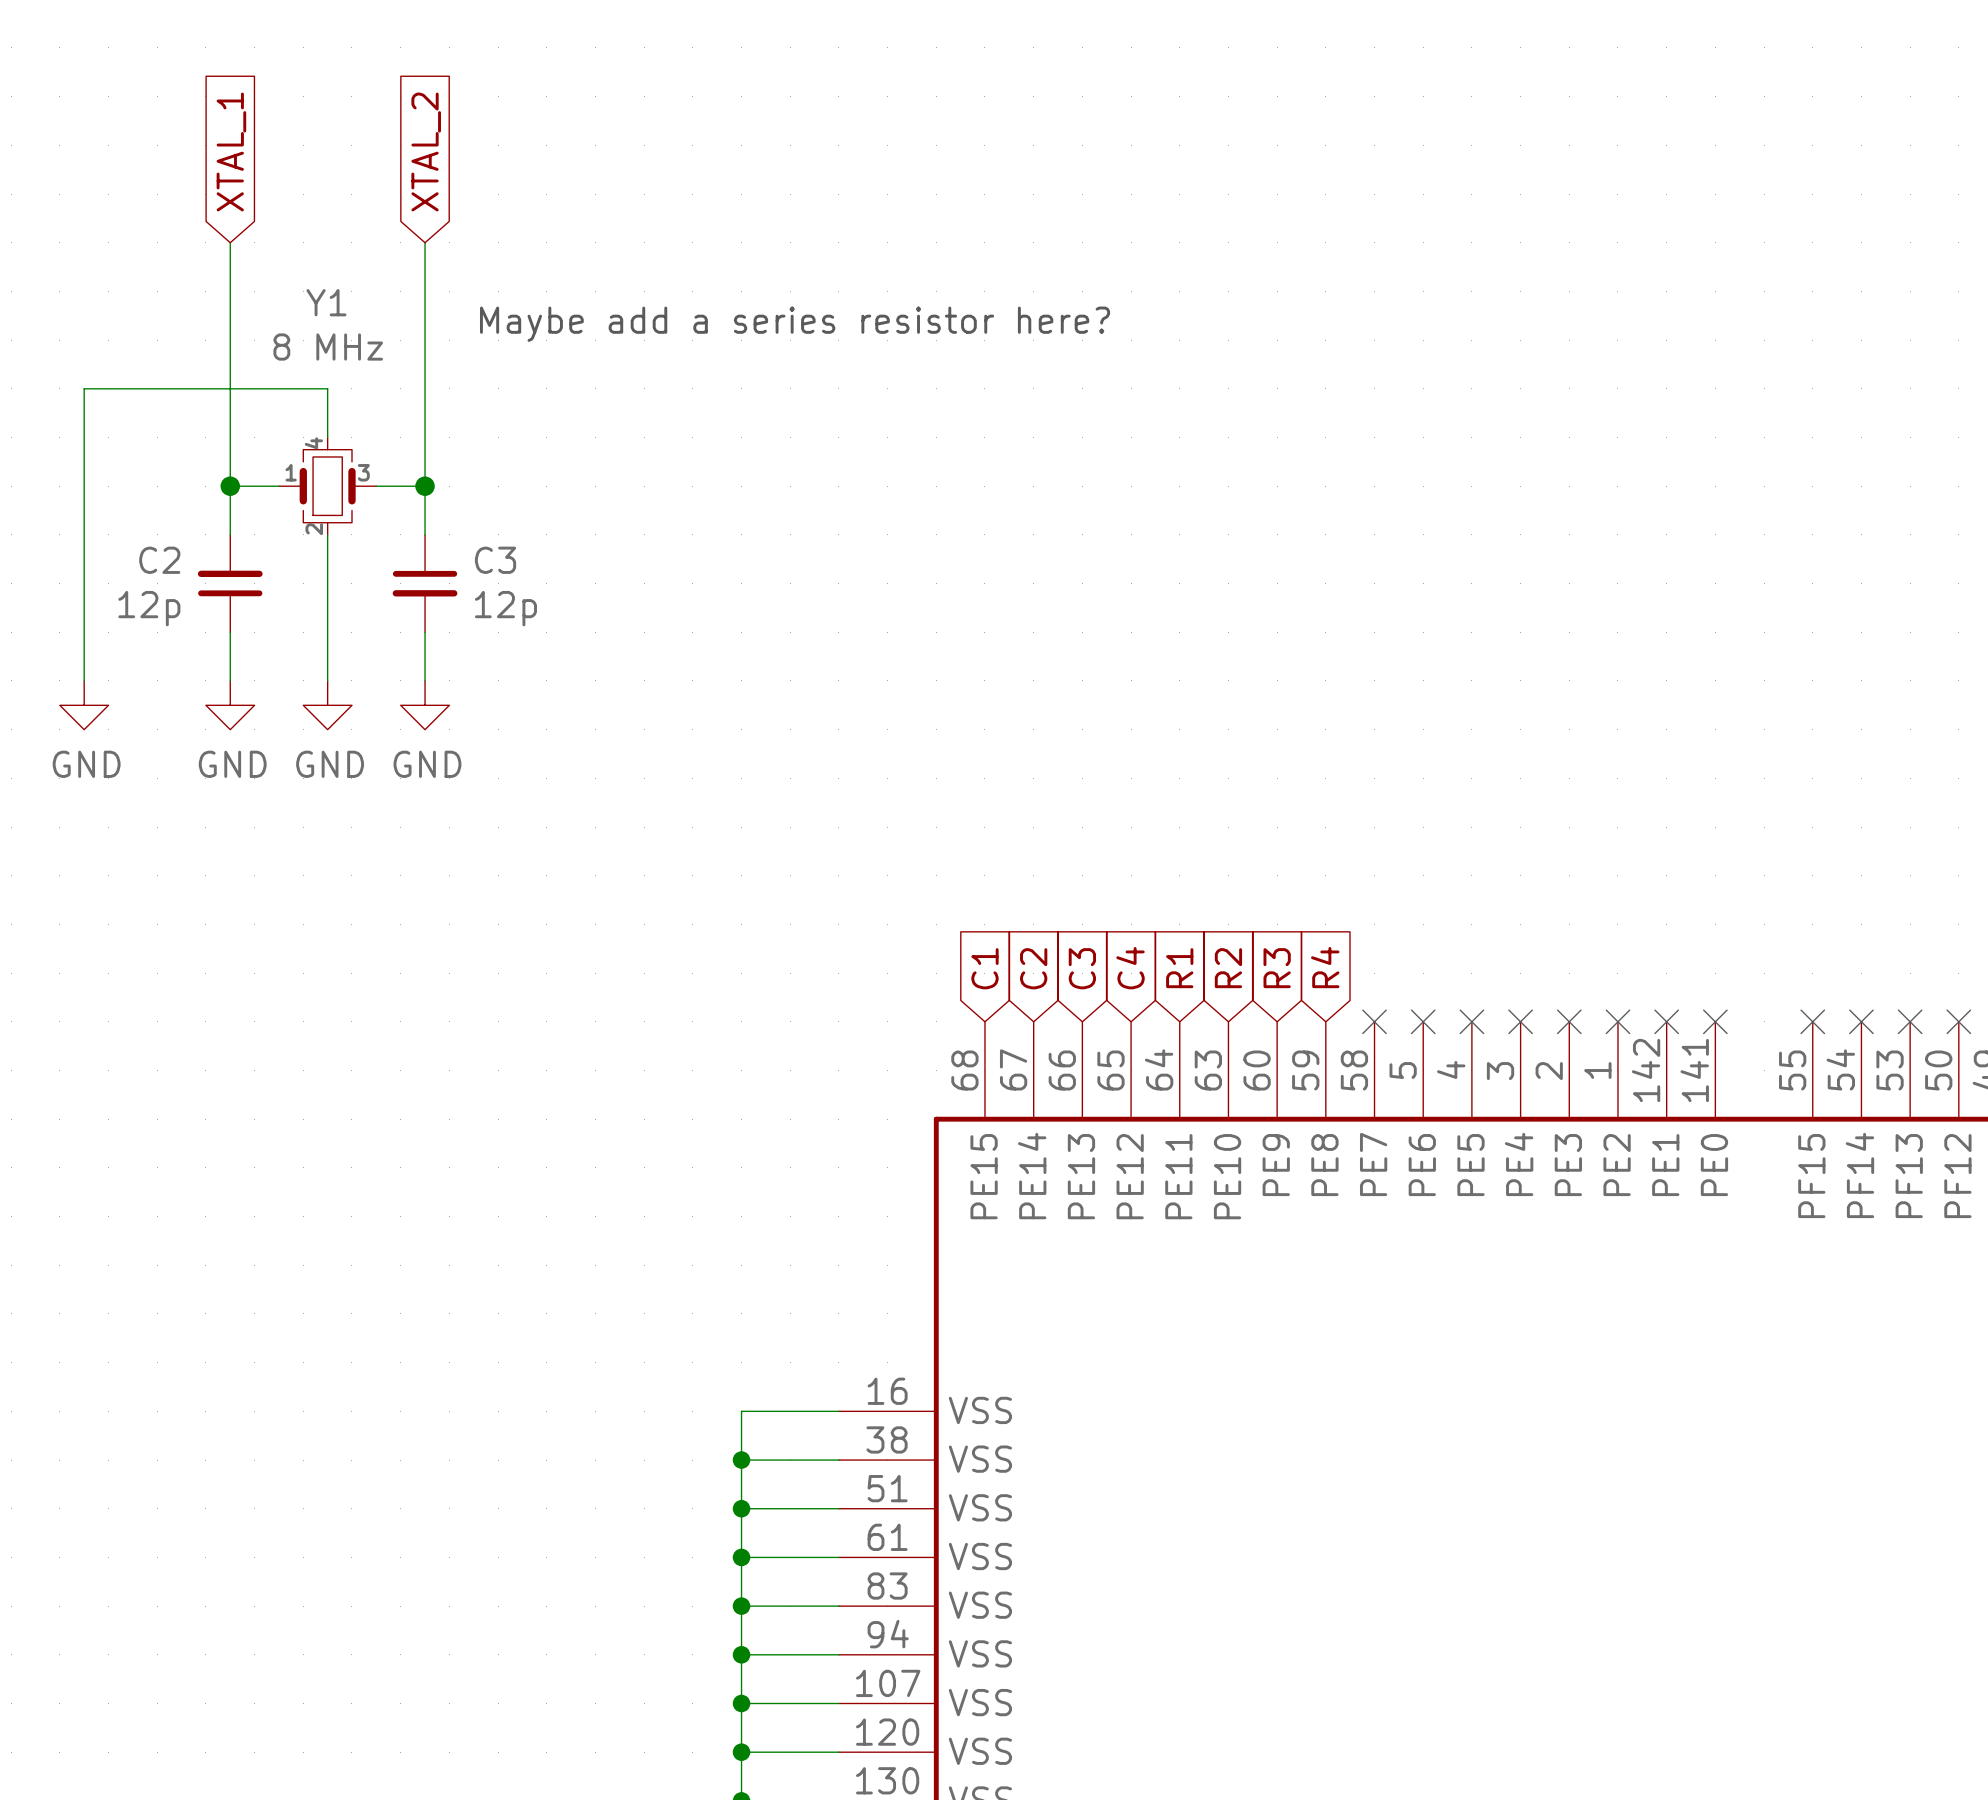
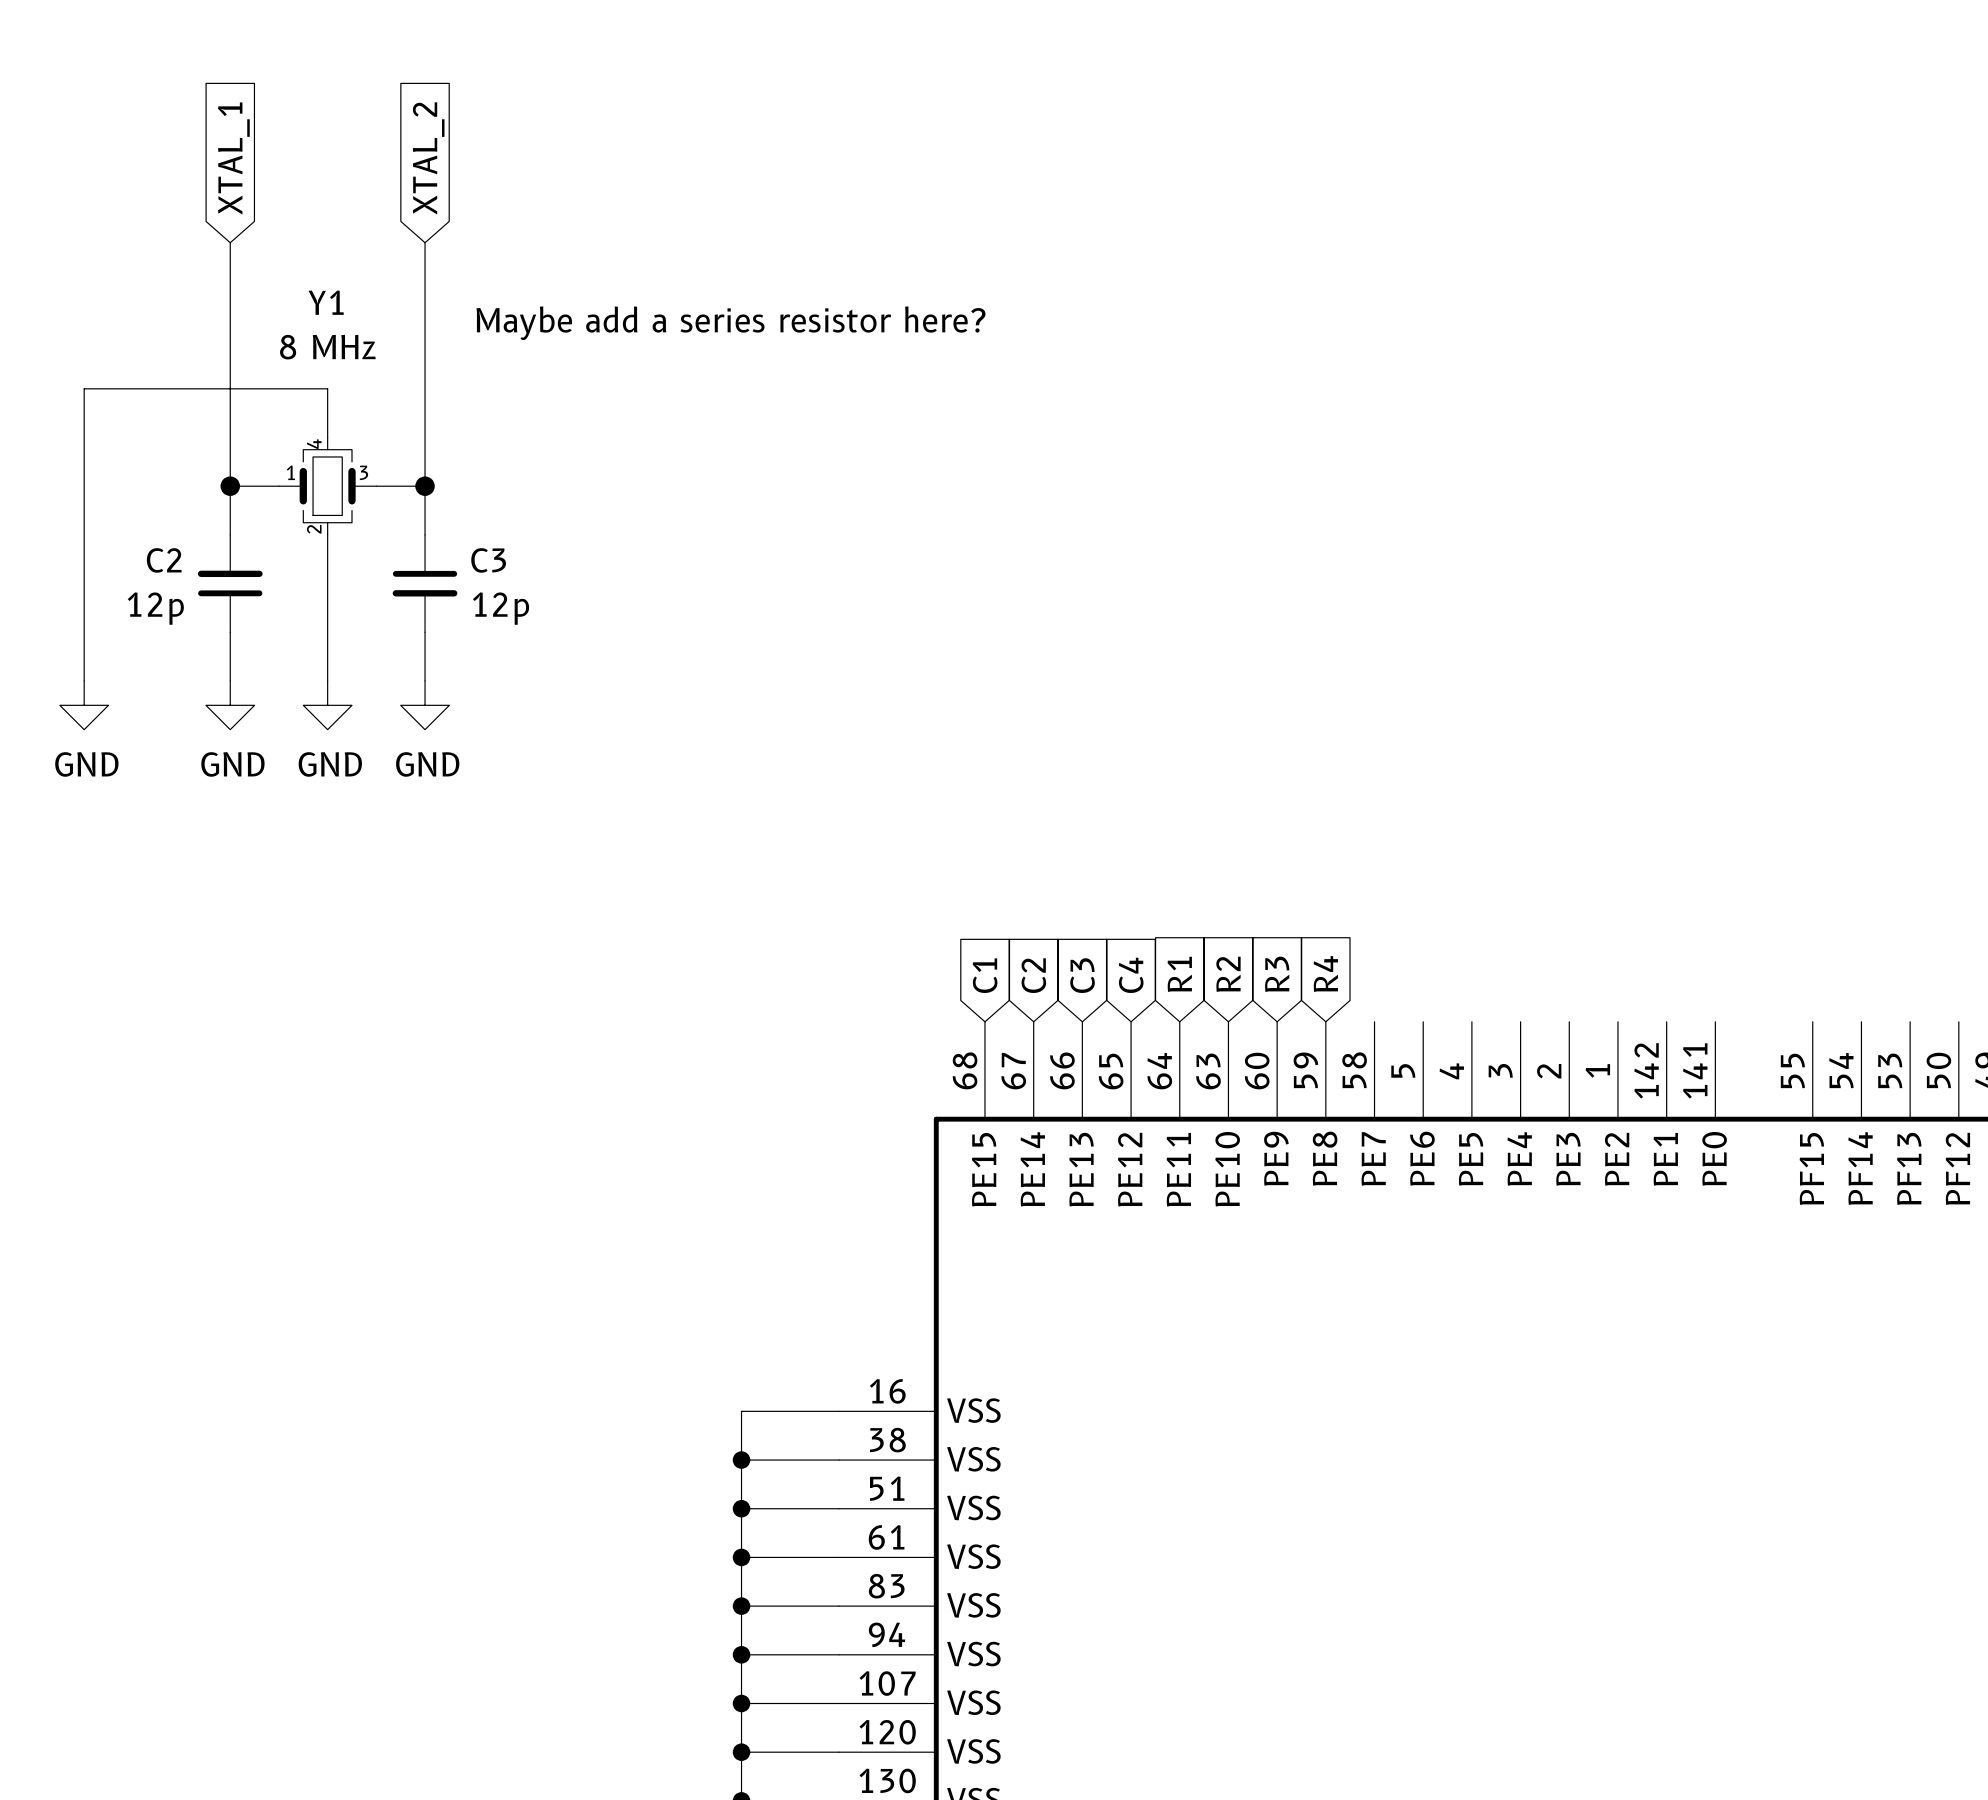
no-connect mark: (1374, 1021) -> none
no-connect mark: (1423, 1021) -> none
no-connect mark: (1471, 1021) -> none
no-connect mark: (1520, 1021) -> none
no-connect mark: (1569, 1021) -> none
no-connect mark: (1617, 1021) -> none
no-connect mark: (1666, 1021) -> none
no-connect mark: (1715, 1021) -> none
no-connect mark: (1812, 1021) -> none
no-connect mark: (1861, 1021) -> none
no-connect mark: (1910, 1021) -> none
no-connect mark: (1958, 1021) -> none

